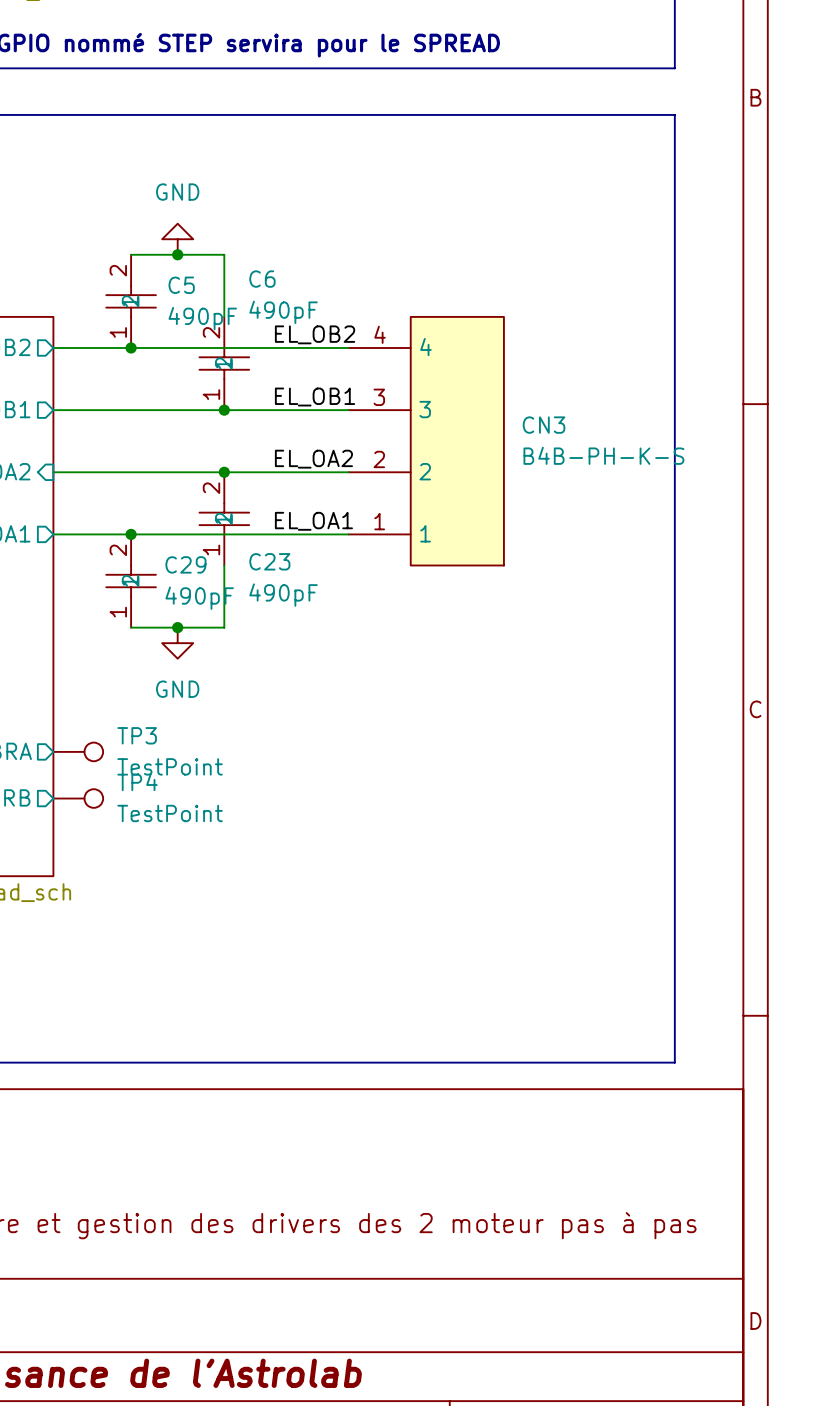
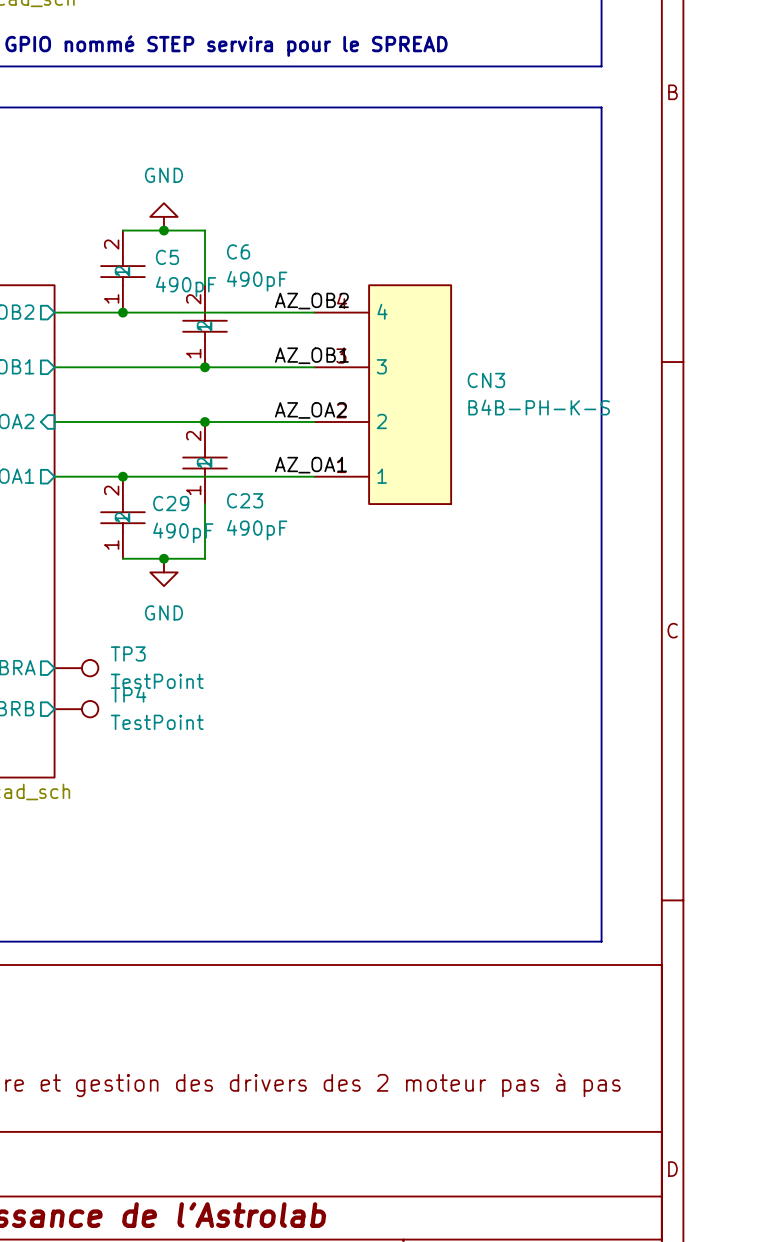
label: EL_OB2 (315, 334) -> AZ_OB2 (311, 301)
label: EL_OB1 (315, 397) -> AZ_OB1 (311, 355)
label: EL_OA2 (313, 459) -> AZ_OA2 (310, 410)
label: EL_OA1 (313, 521) -> AZ_OA1 (310, 465)

